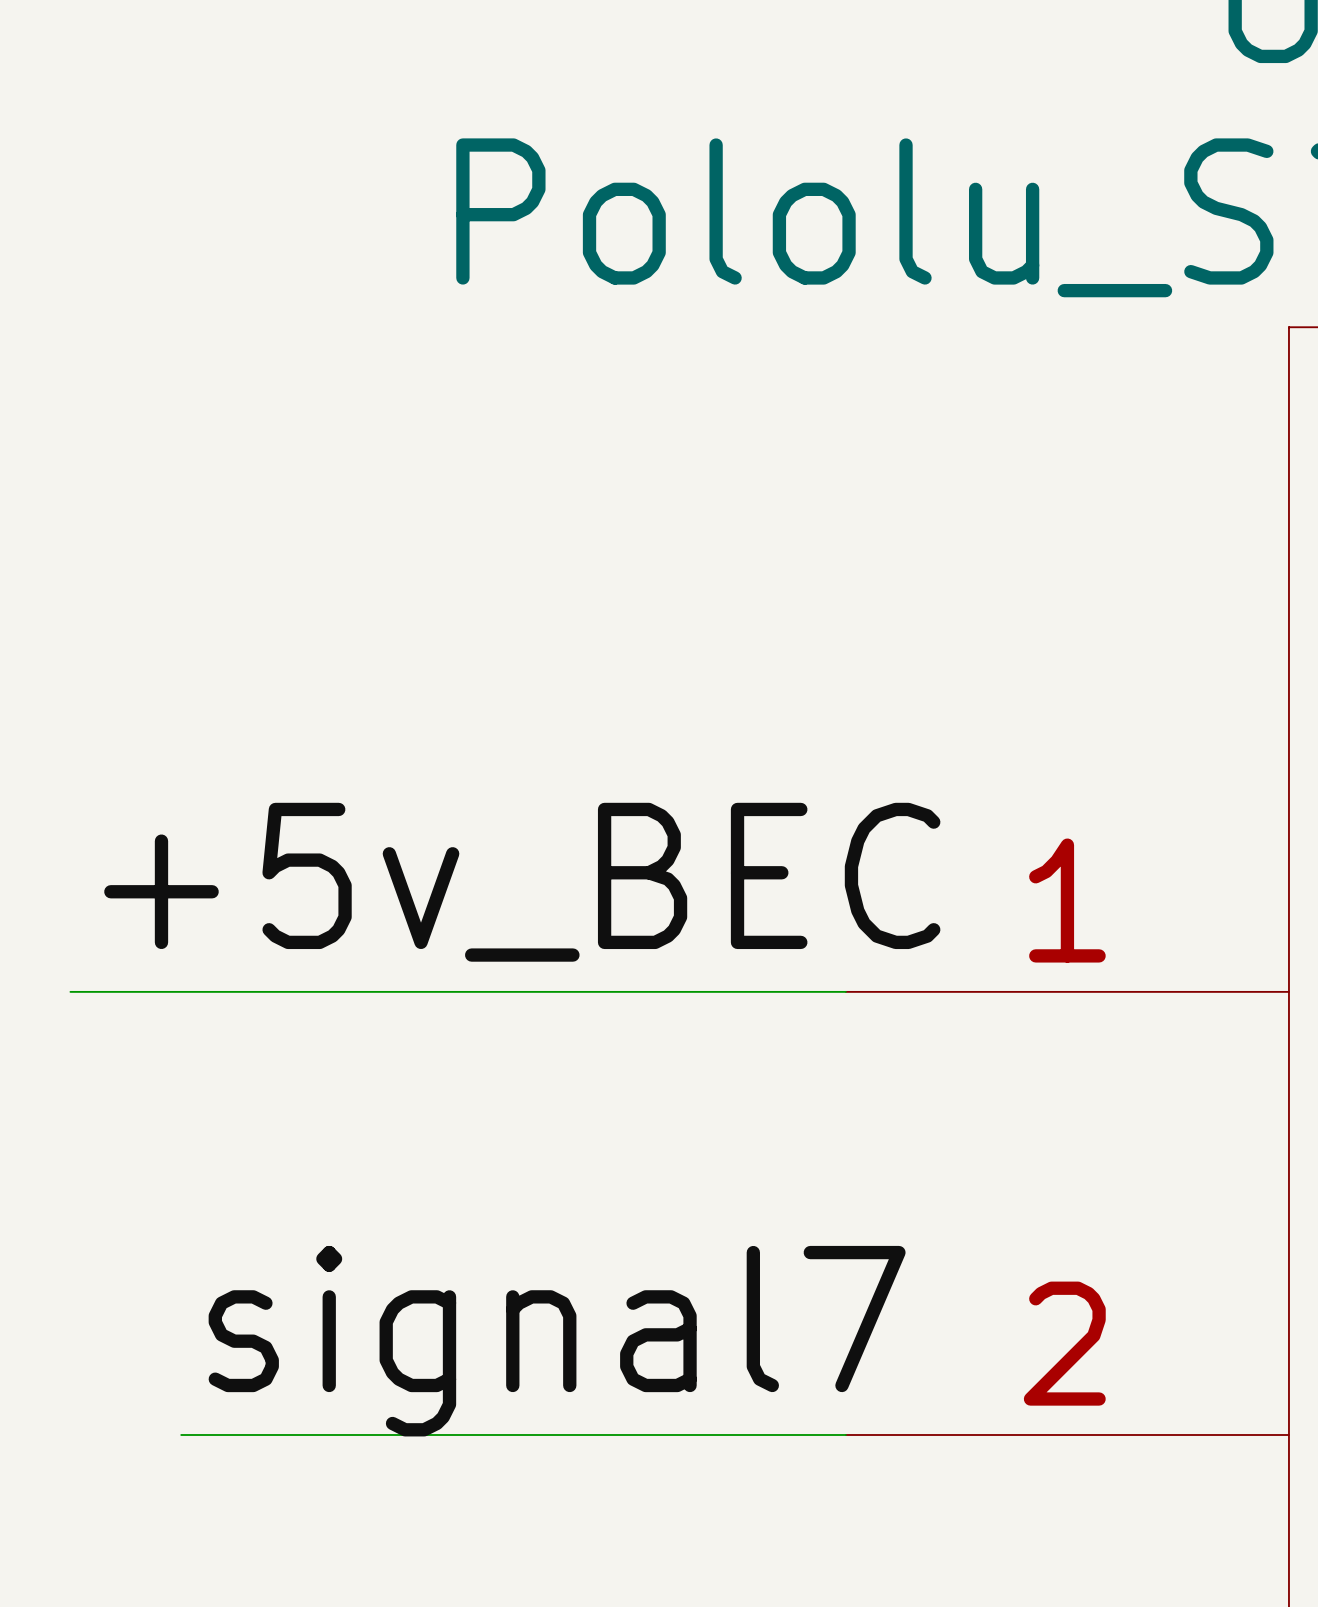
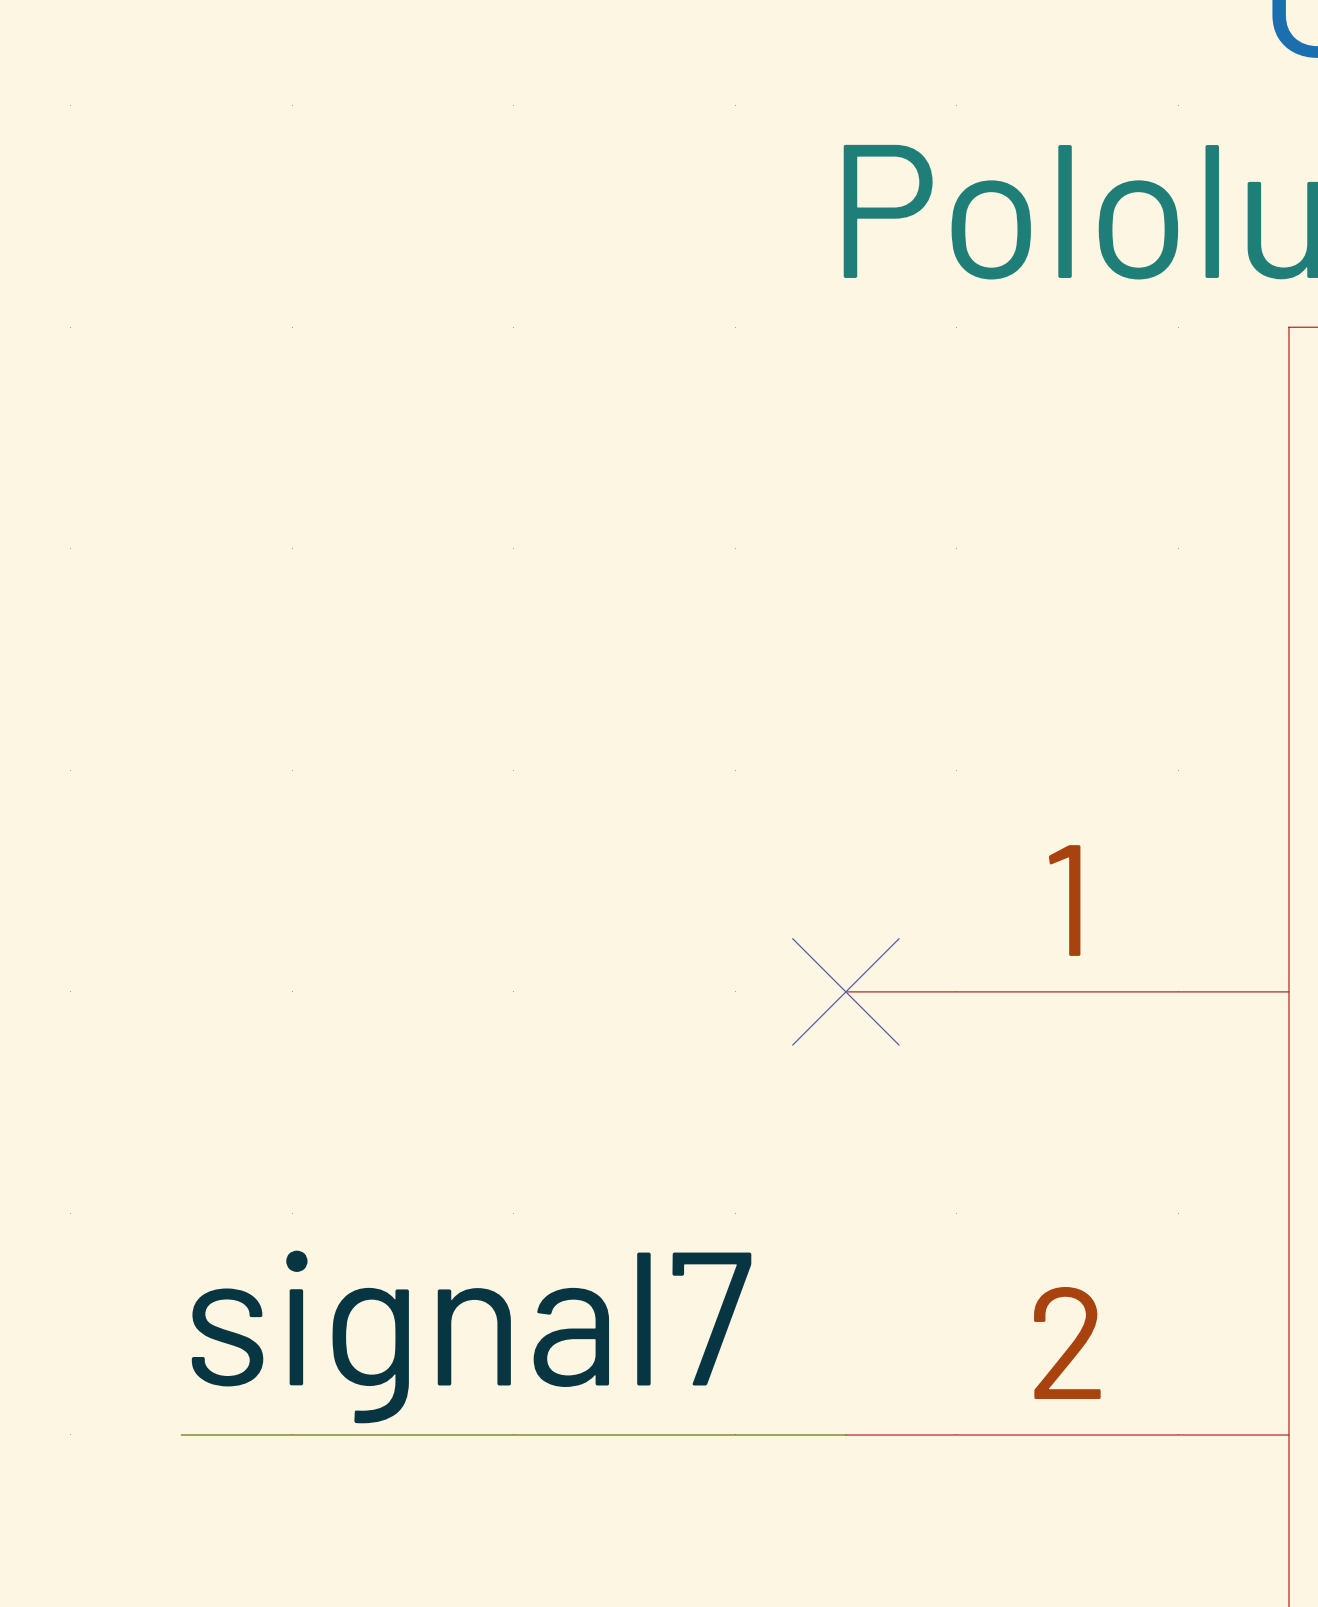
label: +5v_BEC (522, 882) -> none
wire: (70, 991) (845, 991) -> none
no-connect mark: none -> (845, 991)

